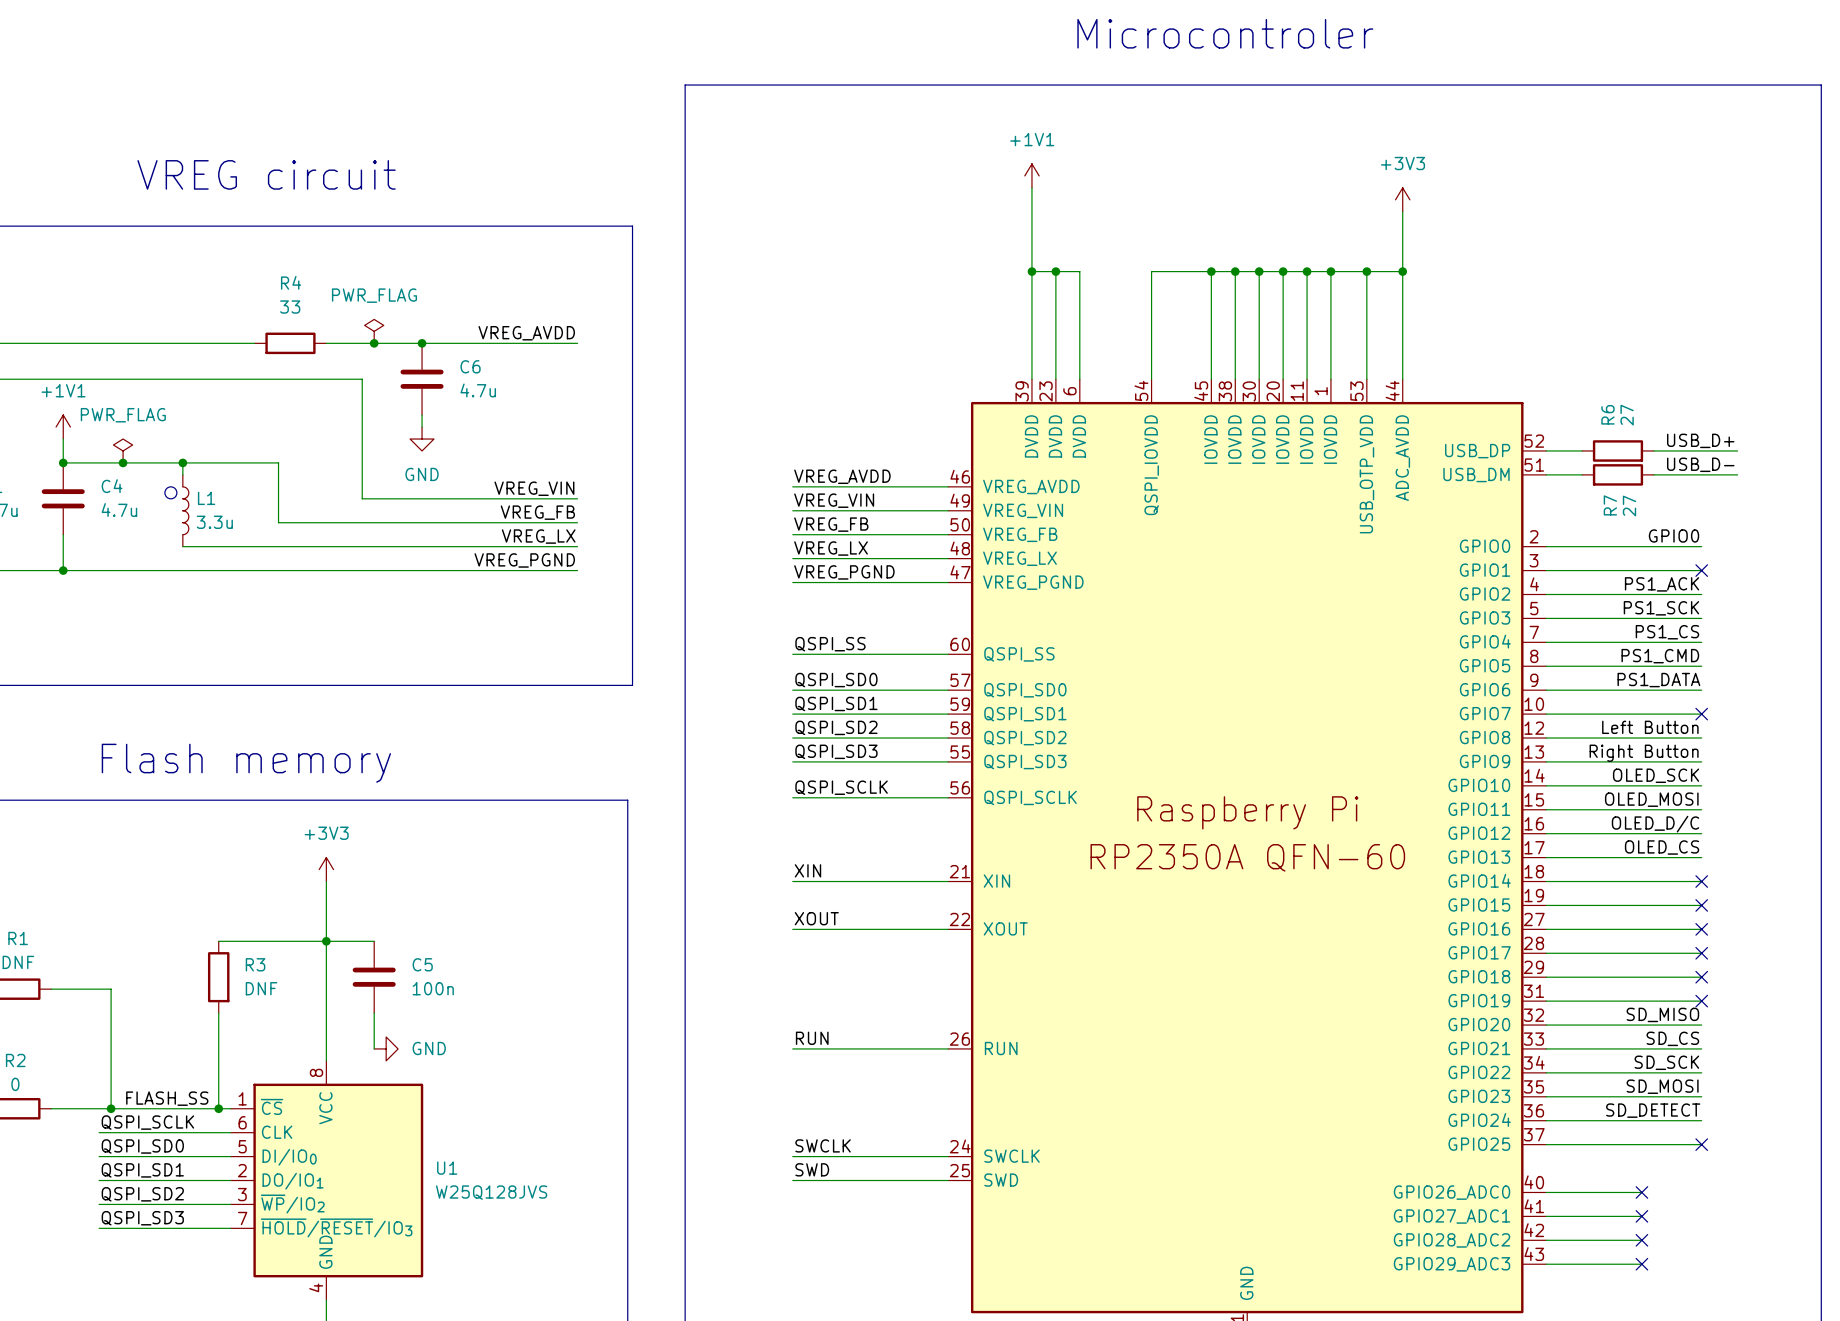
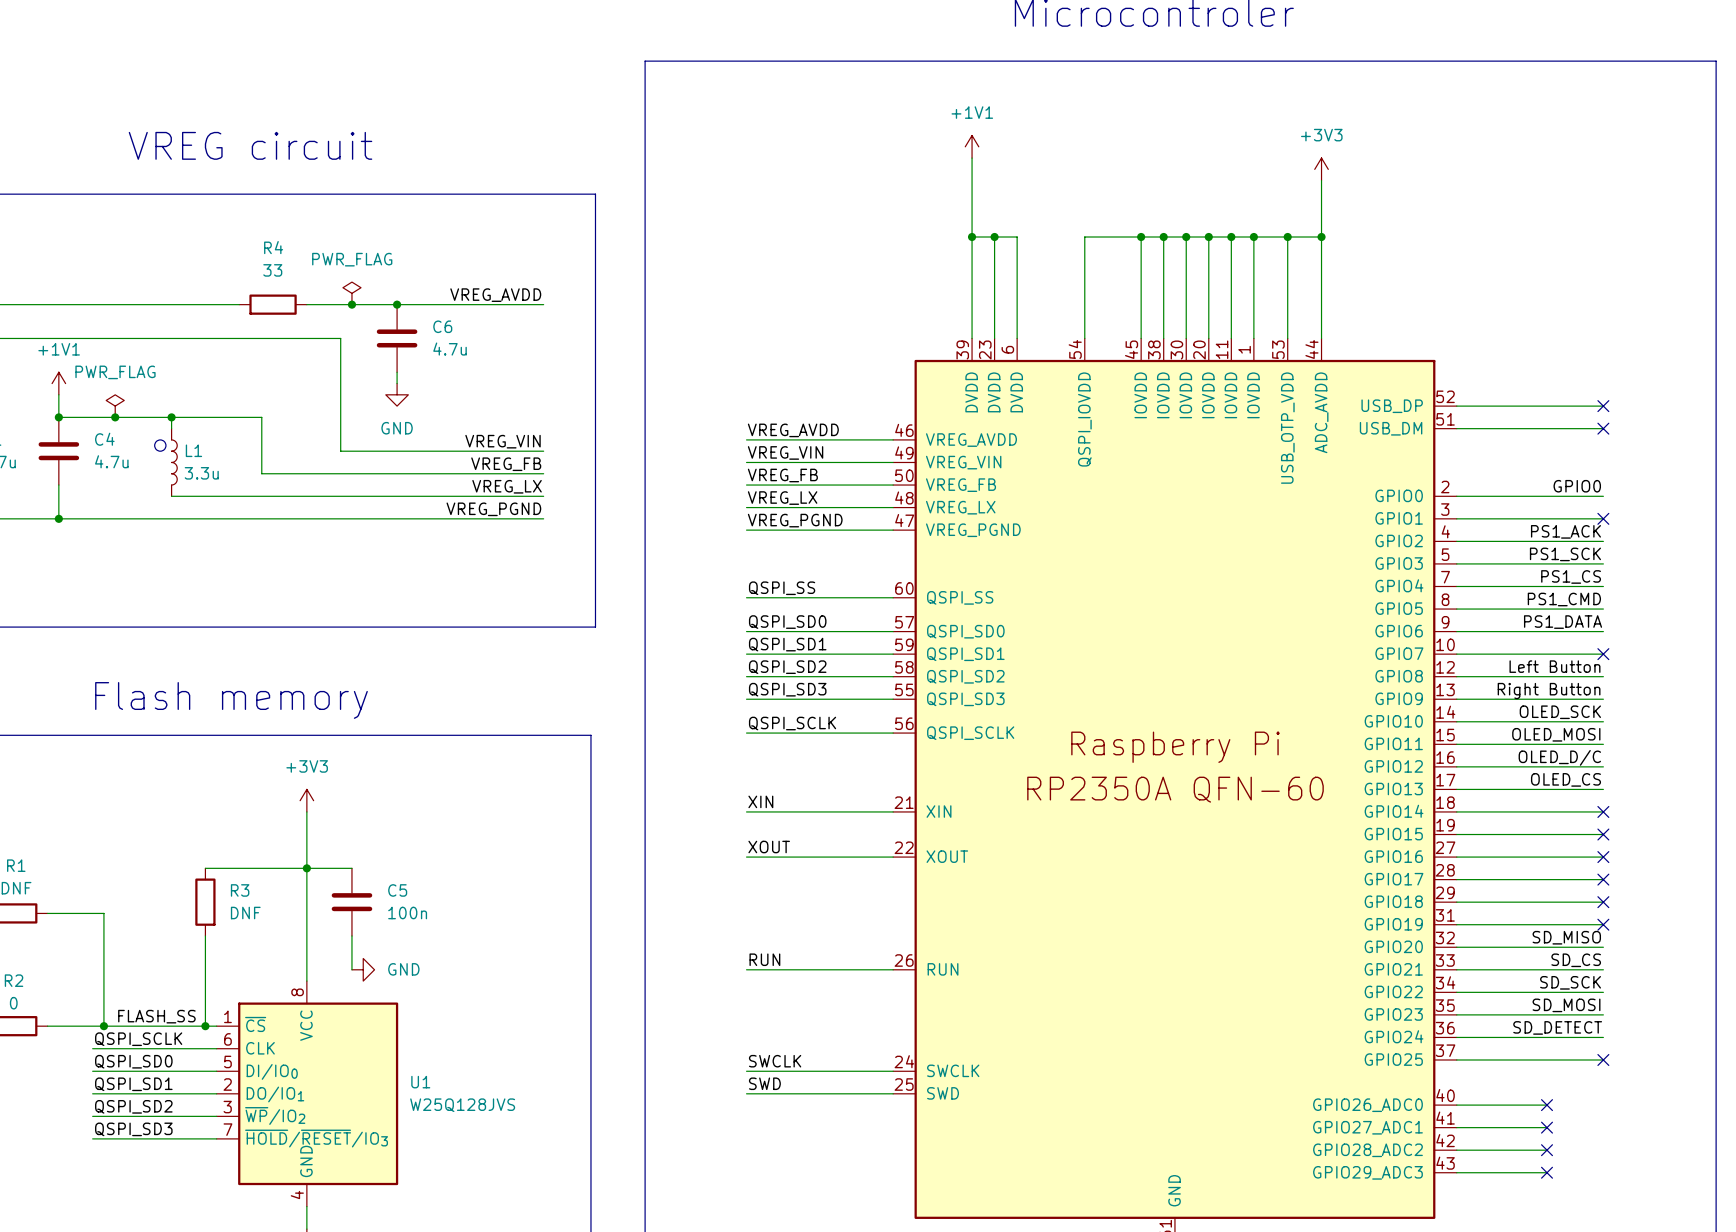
label: USB_D+ (1700, 440) -> none
wire: none -> (1490, 406) (1558, 406)
R6: 27 (1617, 450) -> none
wire: (1701, 450) (1737, 450) -> none
no-connect mark: none -> (1603, 406)
label: USB_D- (1700, 464) -> none
wire: none -> (1490, 428) (1558, 428)
R7: 27 (1617, 474) -> none
wire: (1701, 474) (1737, 474) -> none
no-connect mark: none -> (1603, 428)

